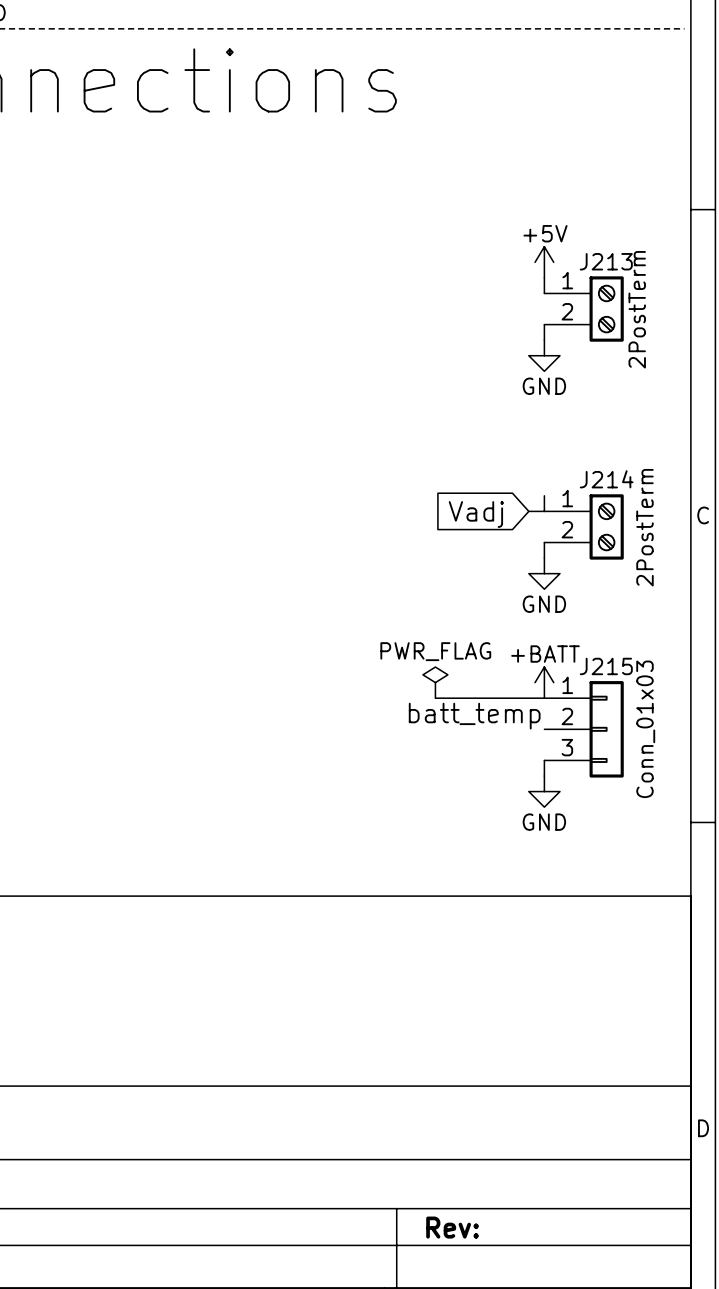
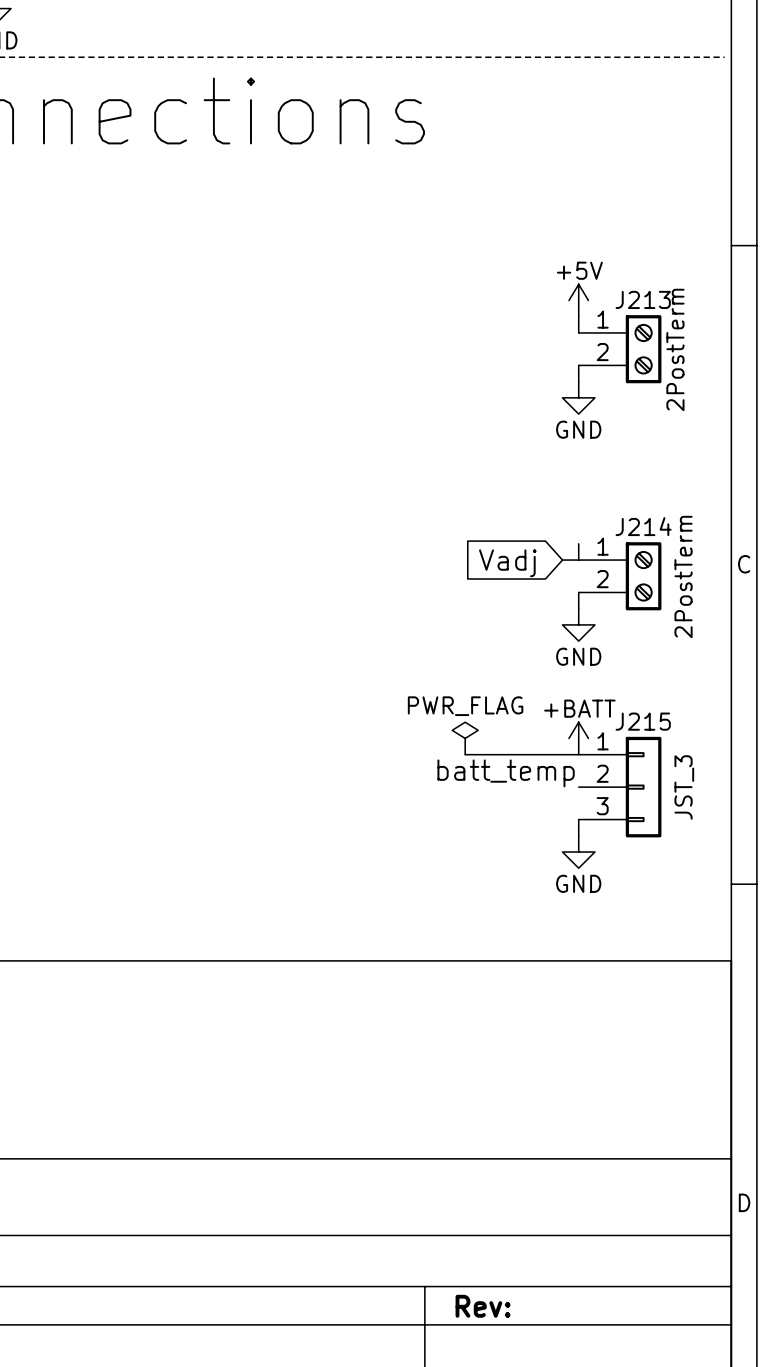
J215 value: Conn_01x03 (645, 729) -> JST_3 (684, 787)

